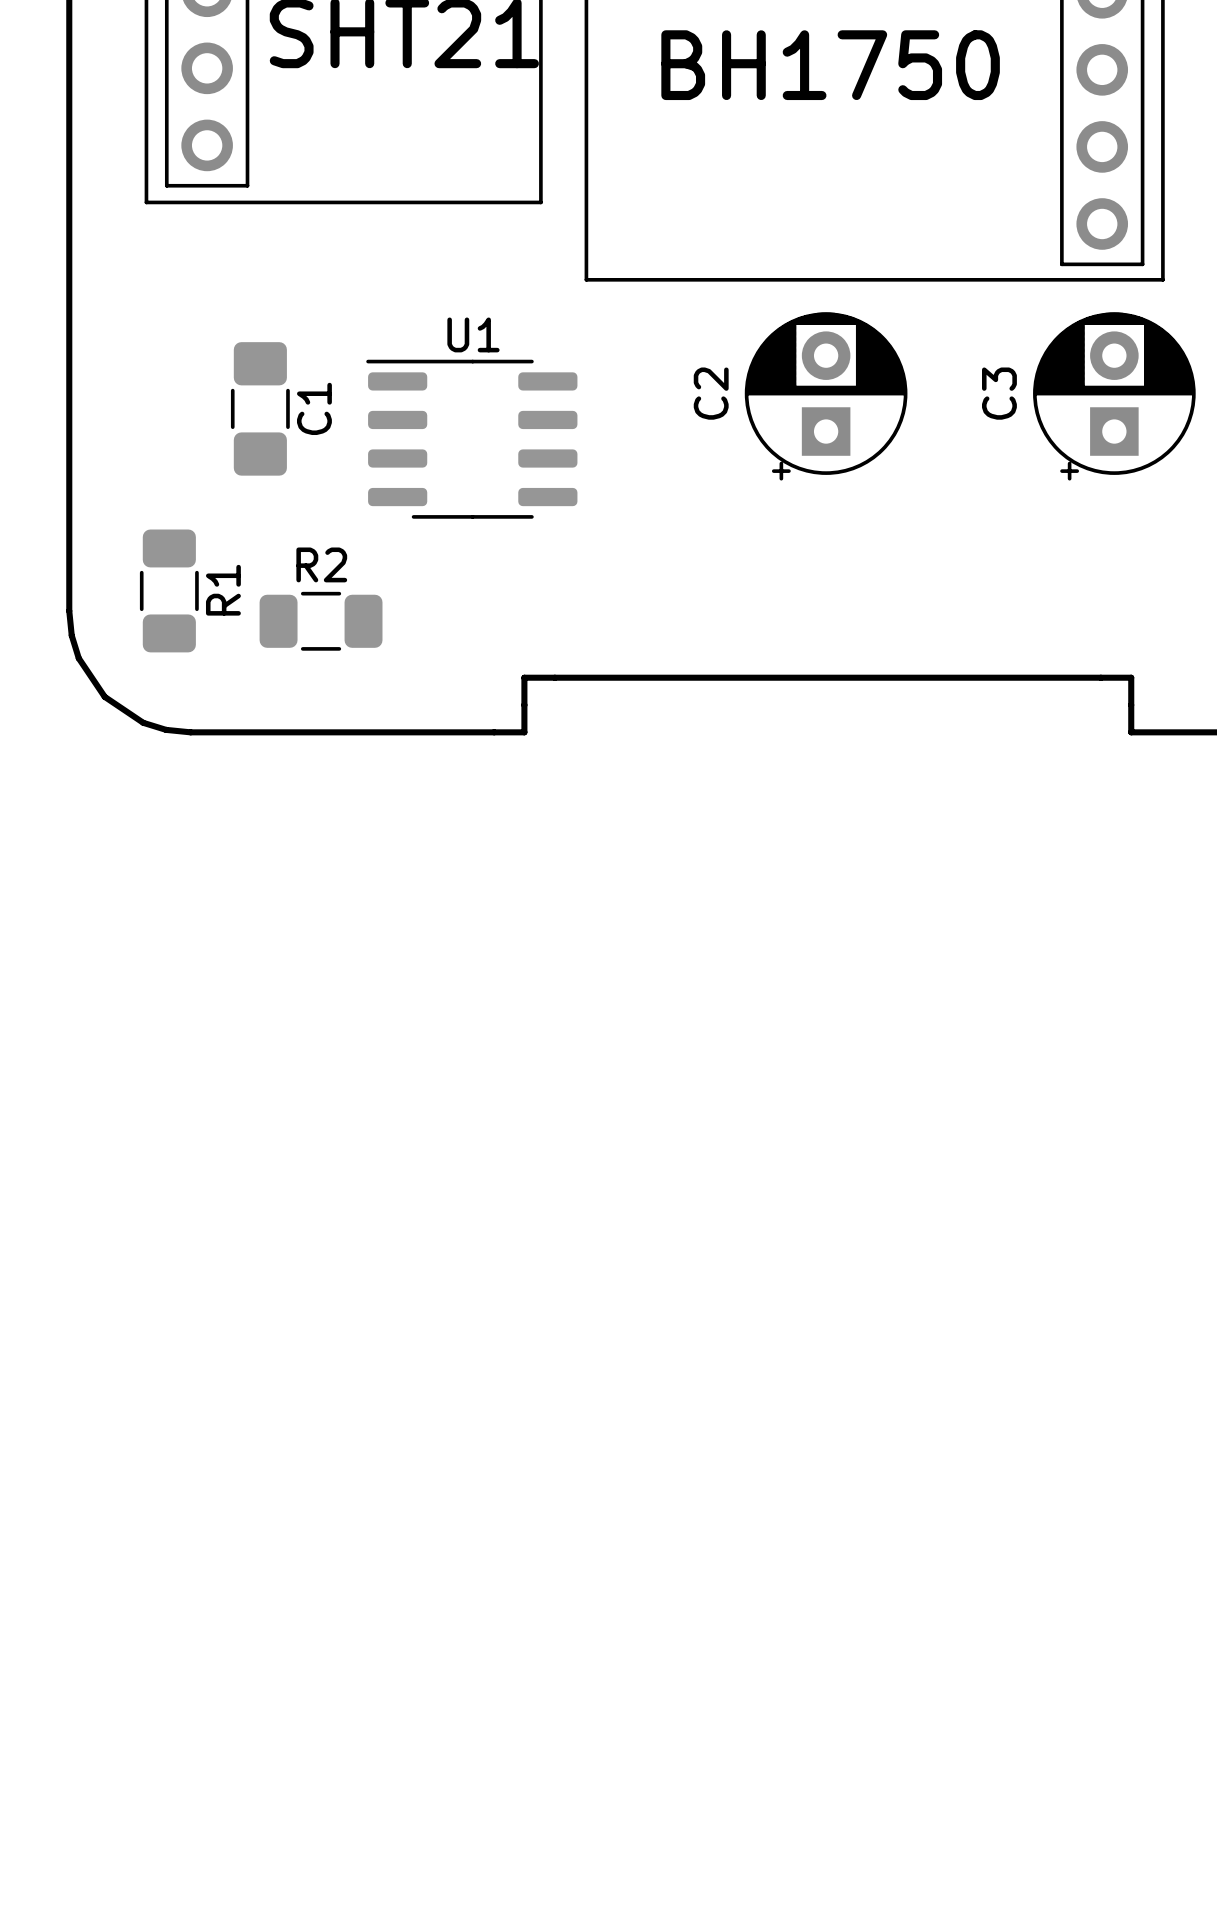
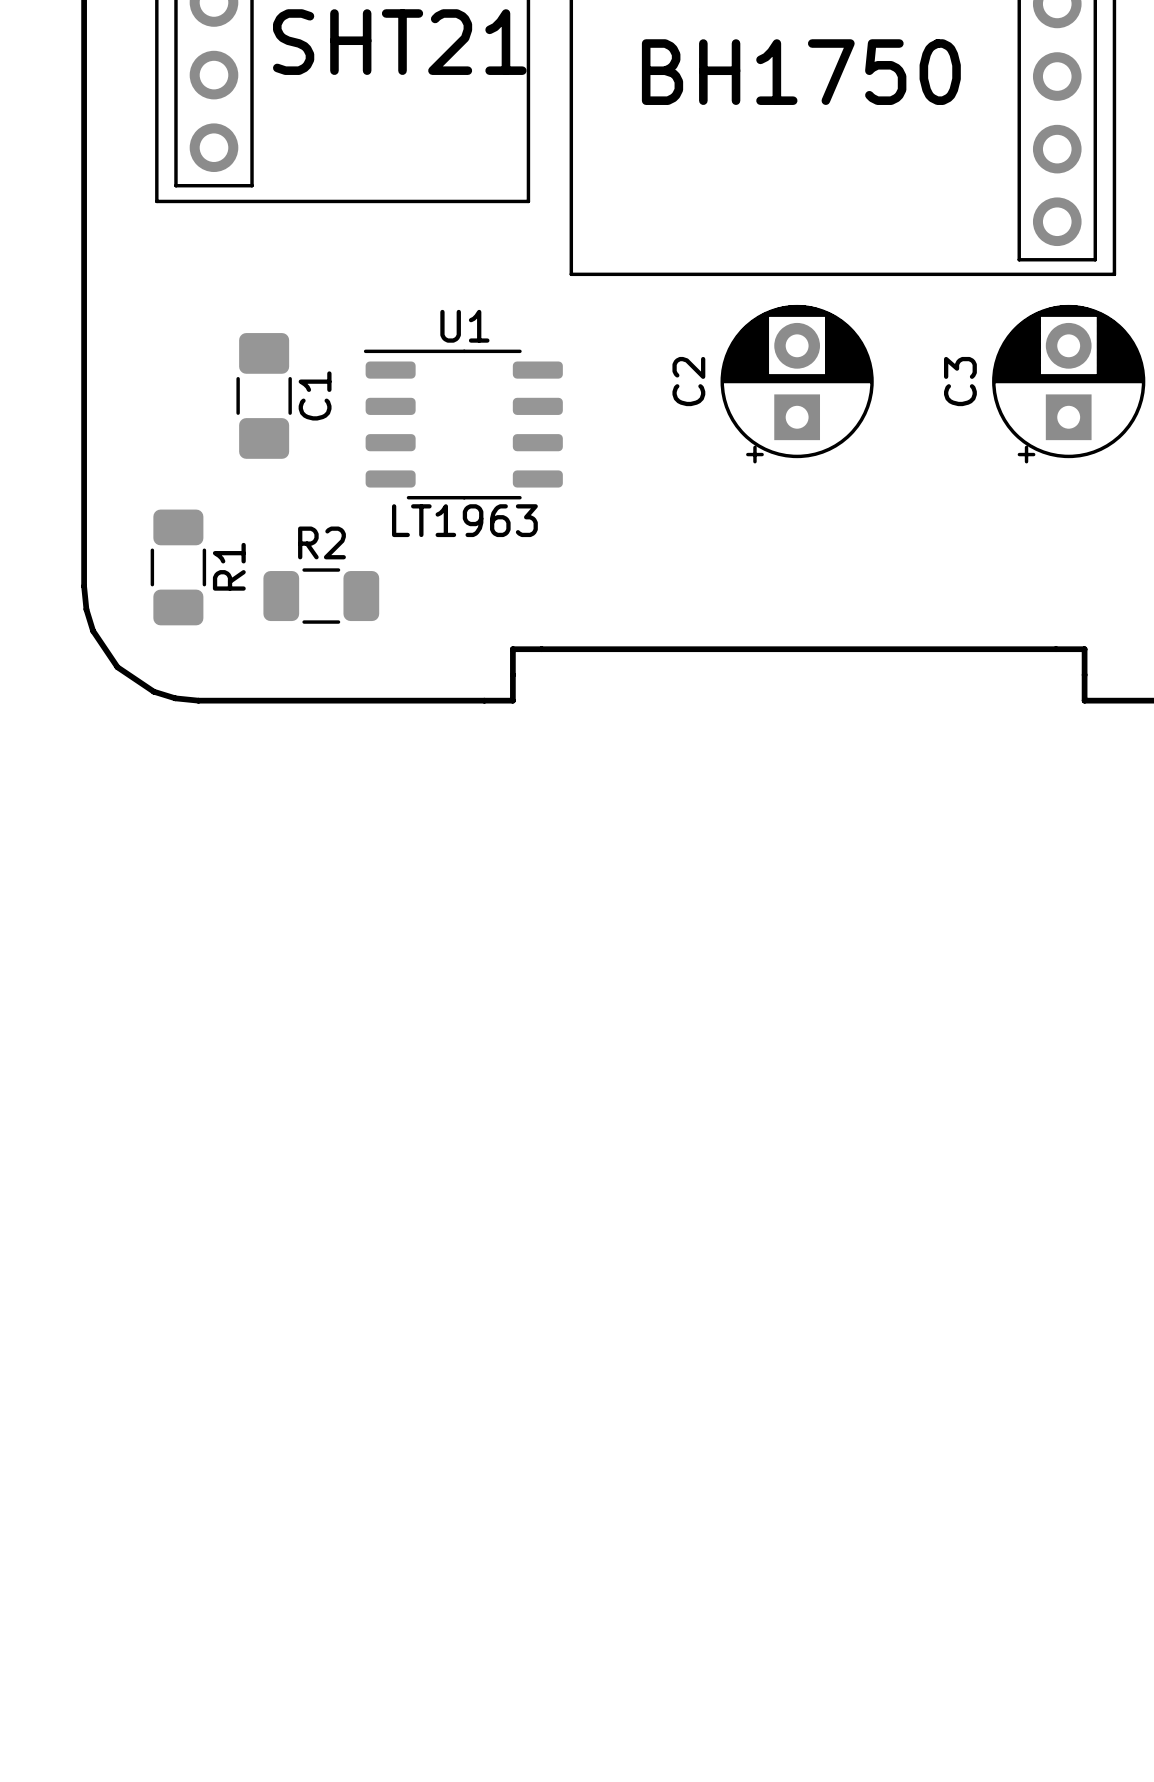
U1 footprint: [366, 359, 578, 519] -> [363, 349, 563, 500]
U1 value: none -> LT1963 (464, 520)

